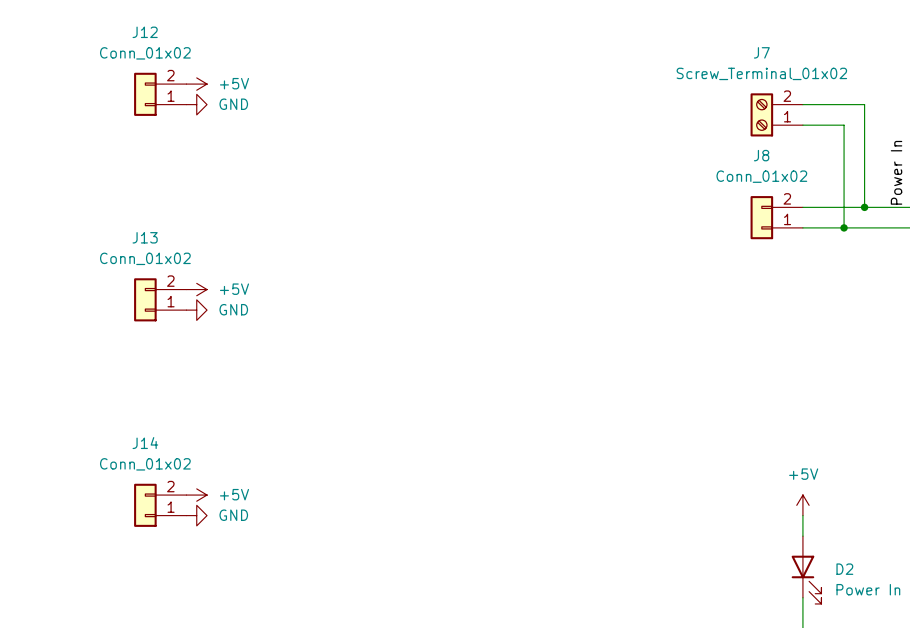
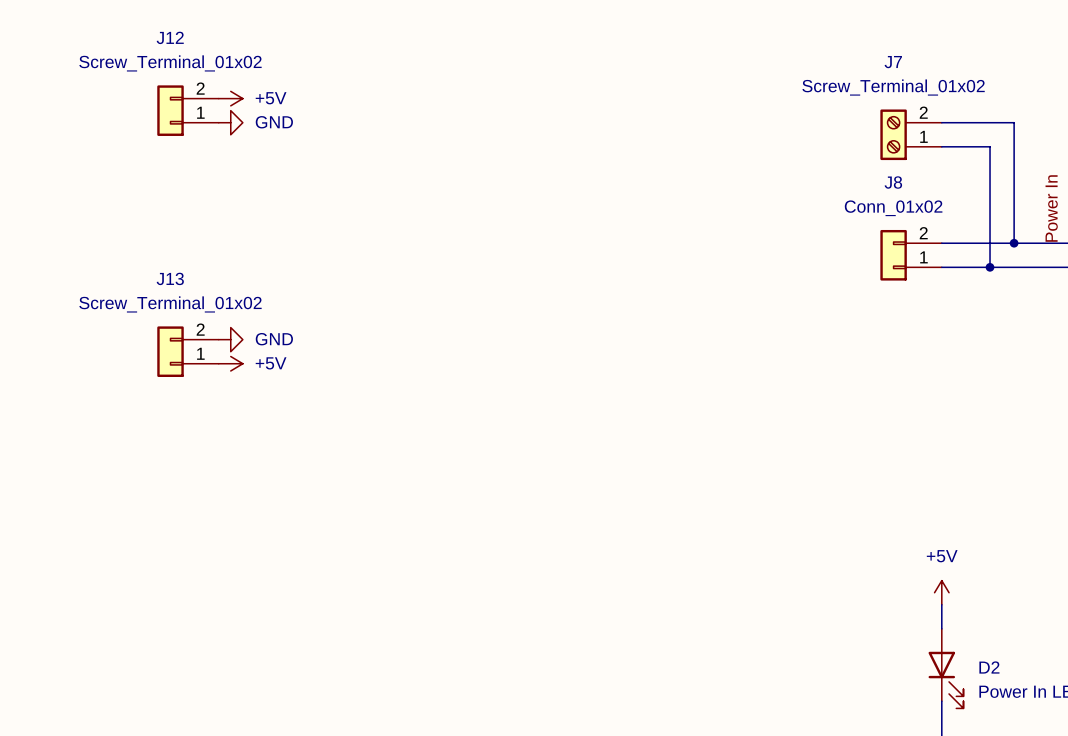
J12 value: Conn_01x02 (145, 53) -> Screw_Terminal_01x02 (170, 63)
J13 value: Conn_01x02 (145, 258) -> Screw_Terminal_01x02 (170, 304)
power symbol: +5V (196, 289) -> GND (230, 339)
power symbol: GND (196, 310) -> +5V (230, 363)
power symbol: +5V (196, 495) -> none
J14: Conn_01x02 (160, 505) -> none
power symbol: GND (196, 515) -> none

